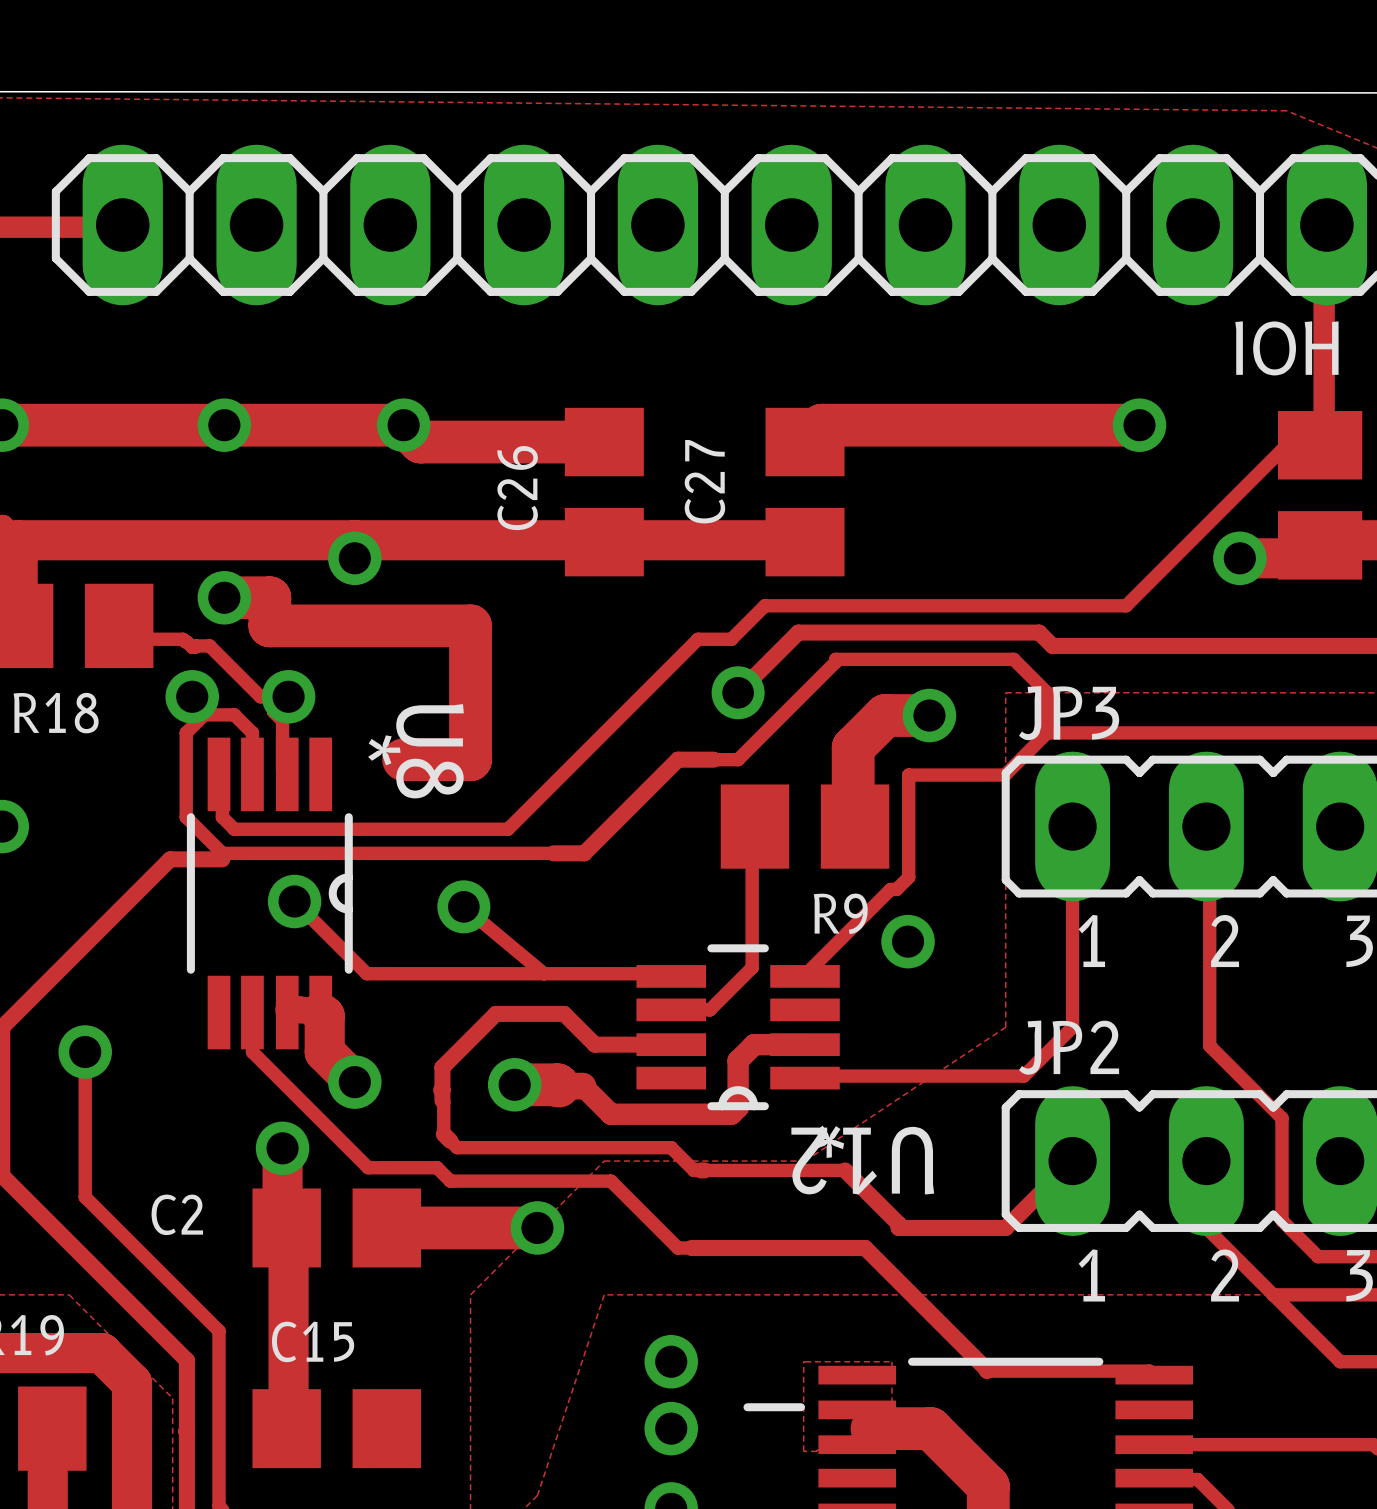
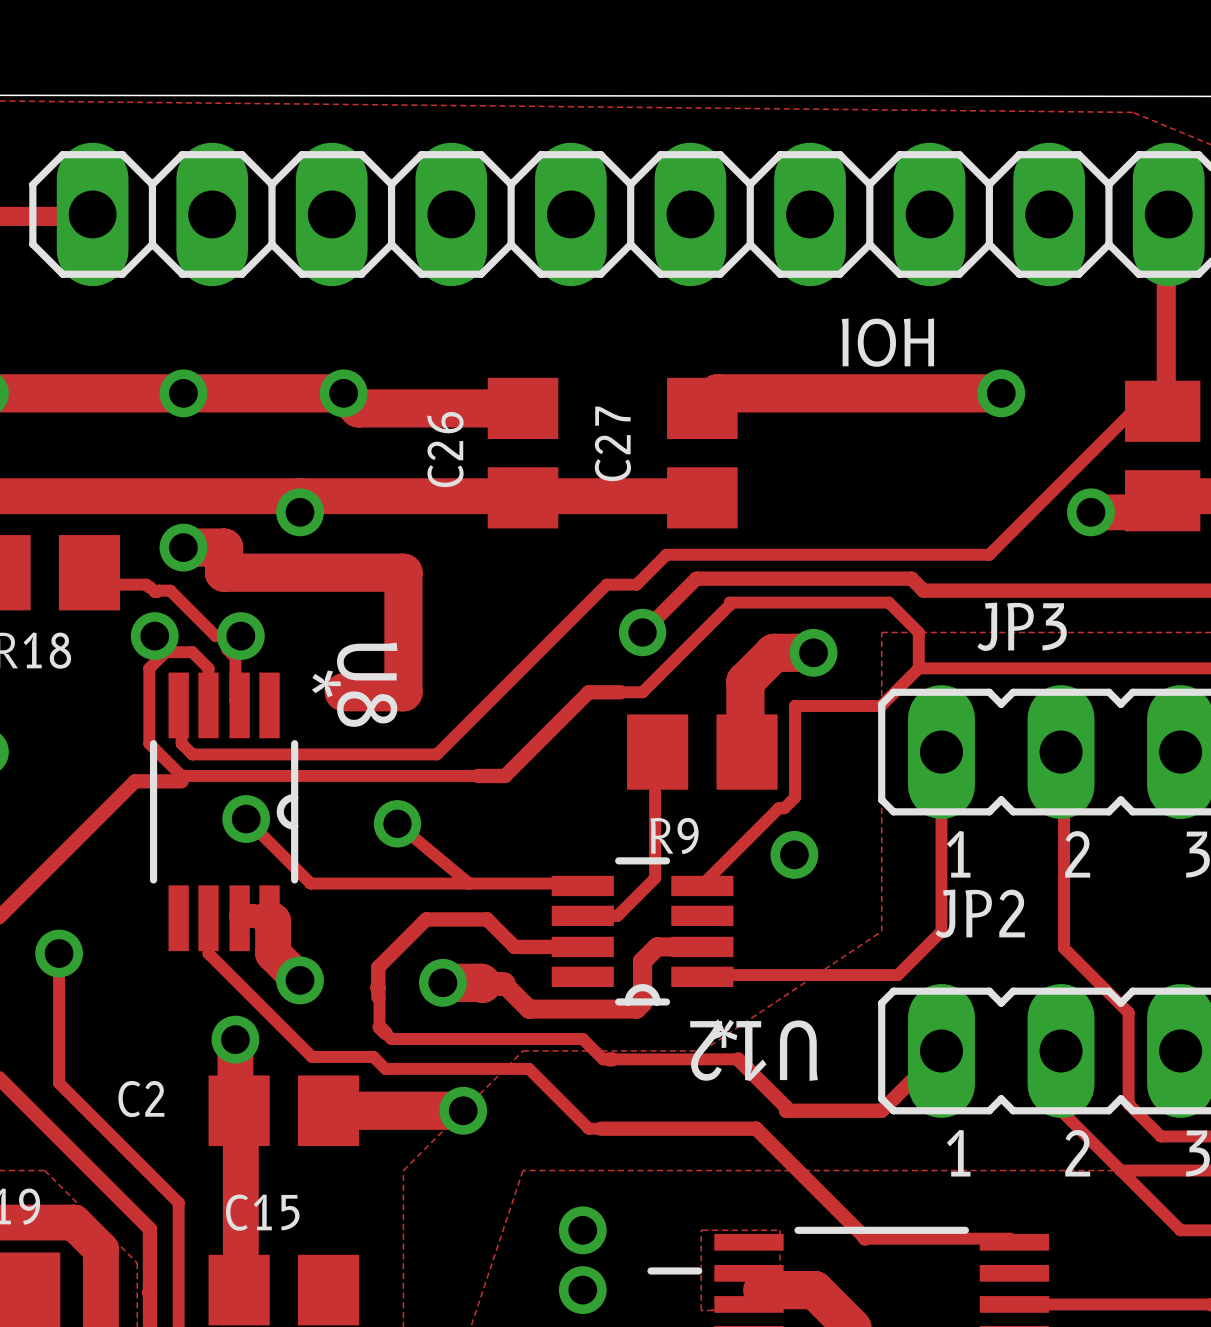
IOH name position: IOH (1286, 348) -> IOH (887, 342)
JP3 name position: JP3 (1069, 713) -> JP3 (1022, 626)
R9 name position: R9 (840, 913) -> R9 (674, 835)
JP2 name position: JP2 (1069, 1047) -> JP2 (980, 913)

